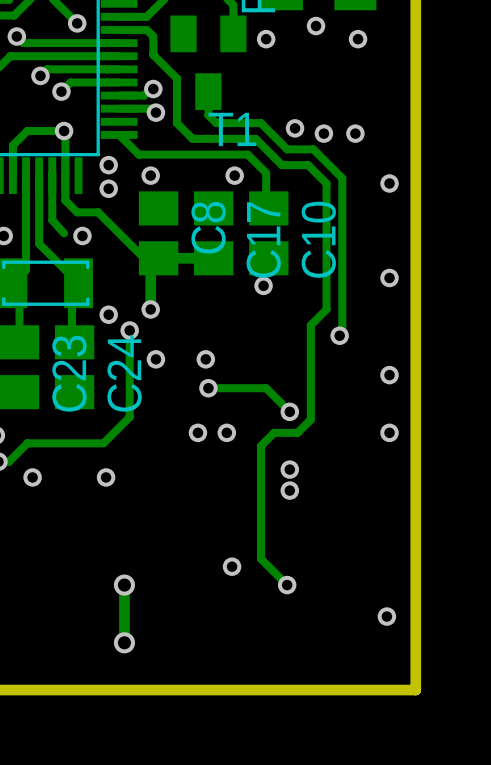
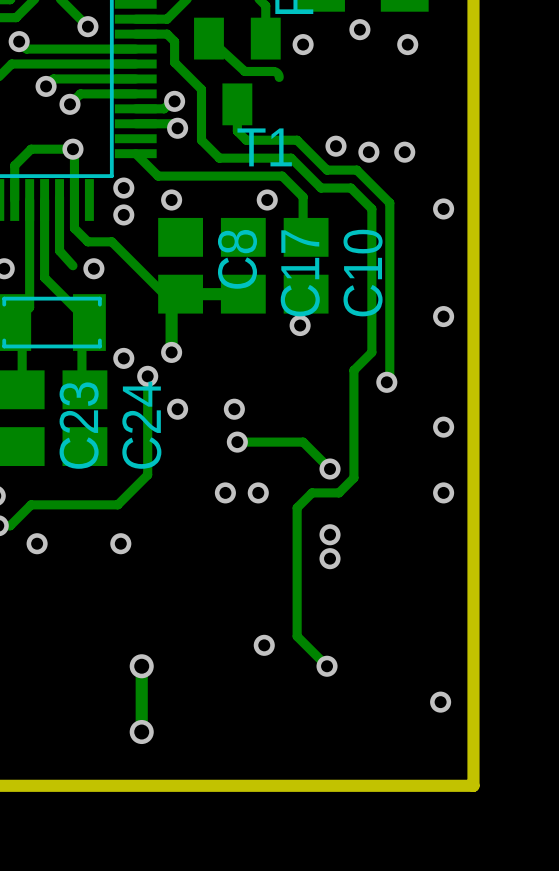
track: none -> (208, 38) (244, 71) (274, 71) (279, 77)

